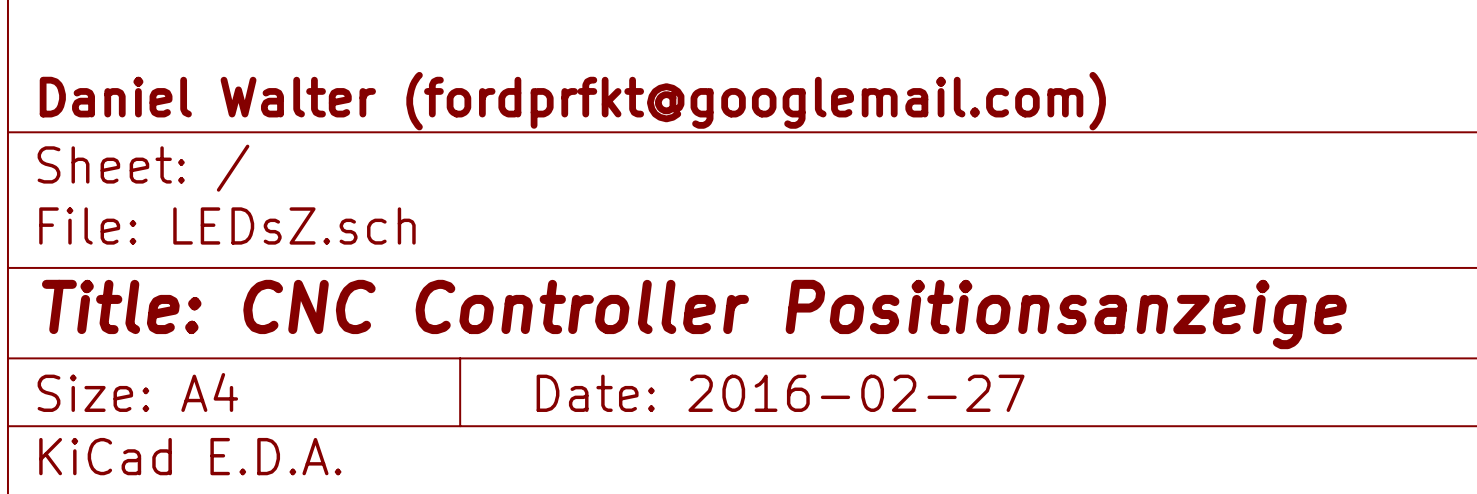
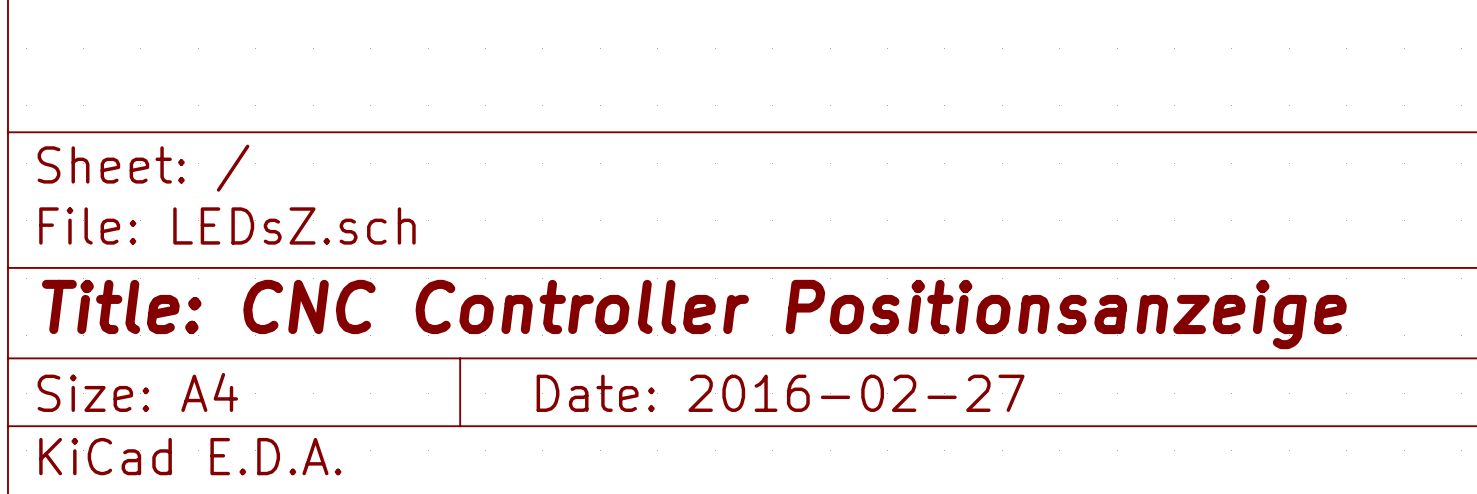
title block: Daniel Walter (fordprfkt@googlemail.com) (572, 101) -> none

